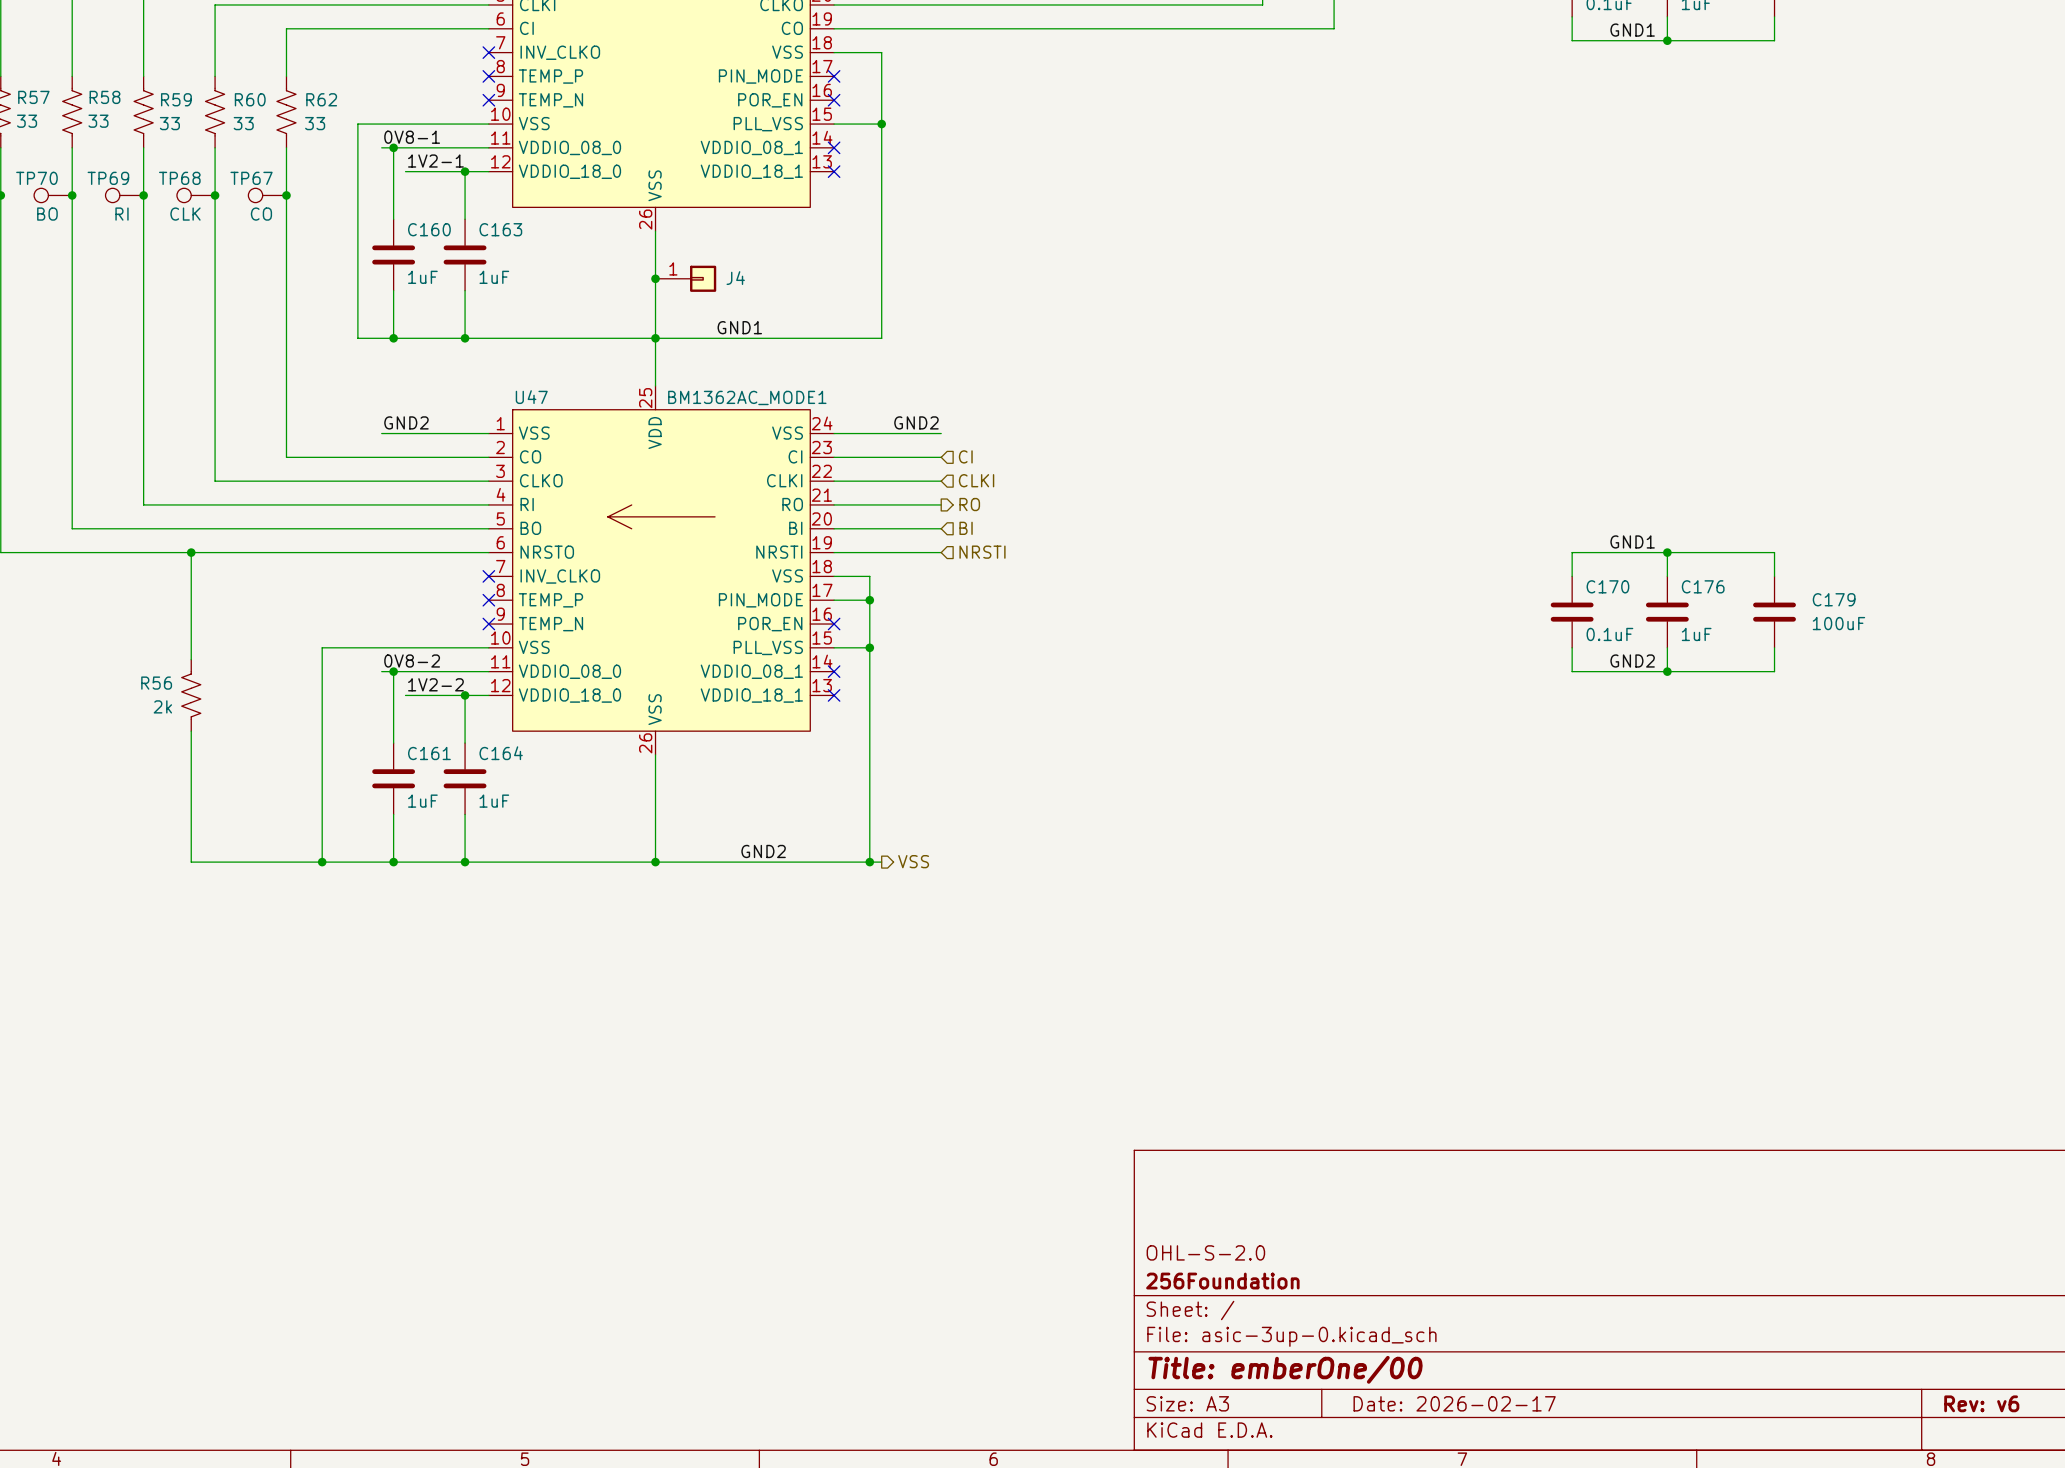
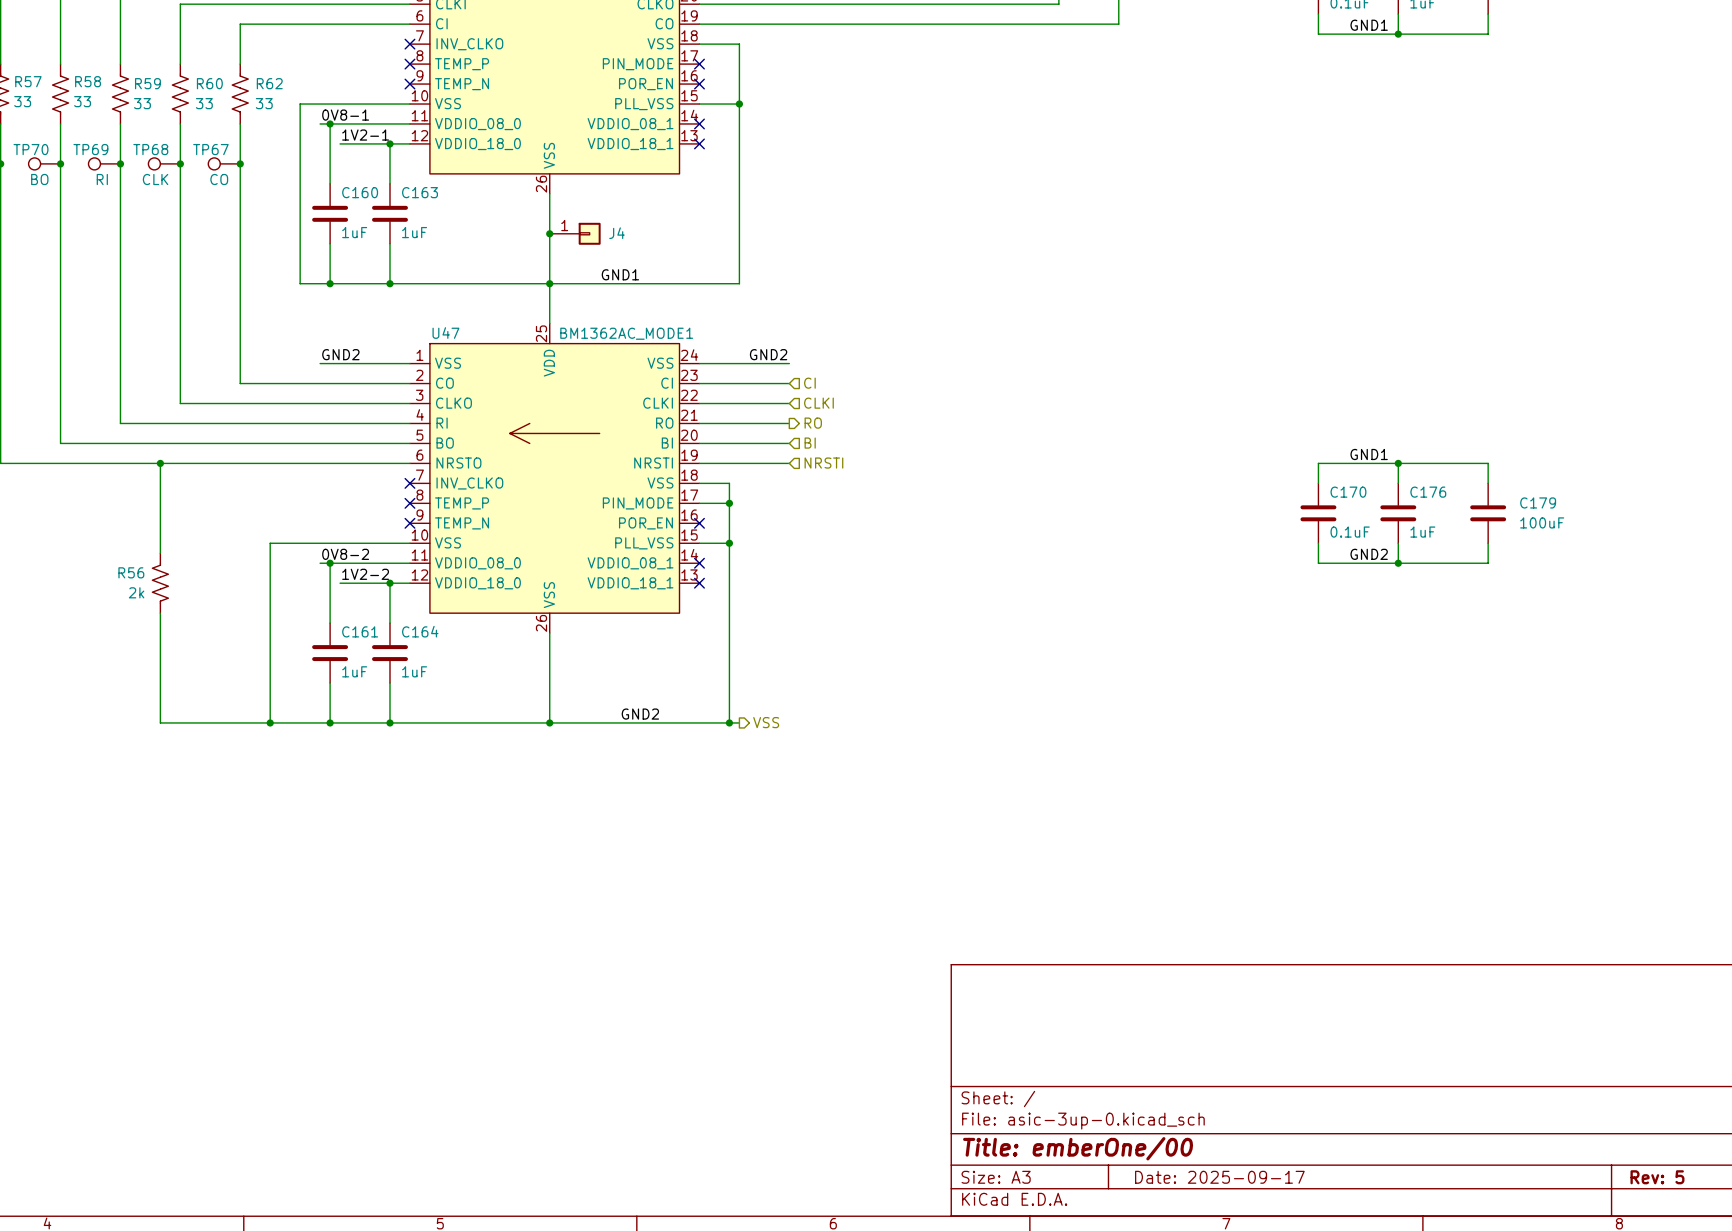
title block: OHL-S-2.0 (1205, 1252) -> none
title block: 256Foundation (1222, 1281) -> none
title block: Date: 2026-02-17 (1454, 1403) -> Date: 2025-09-17 (1219, 1177)
title block: Rev: v6 (1981, 1403) -> Rev: 5 (1657, 1177)

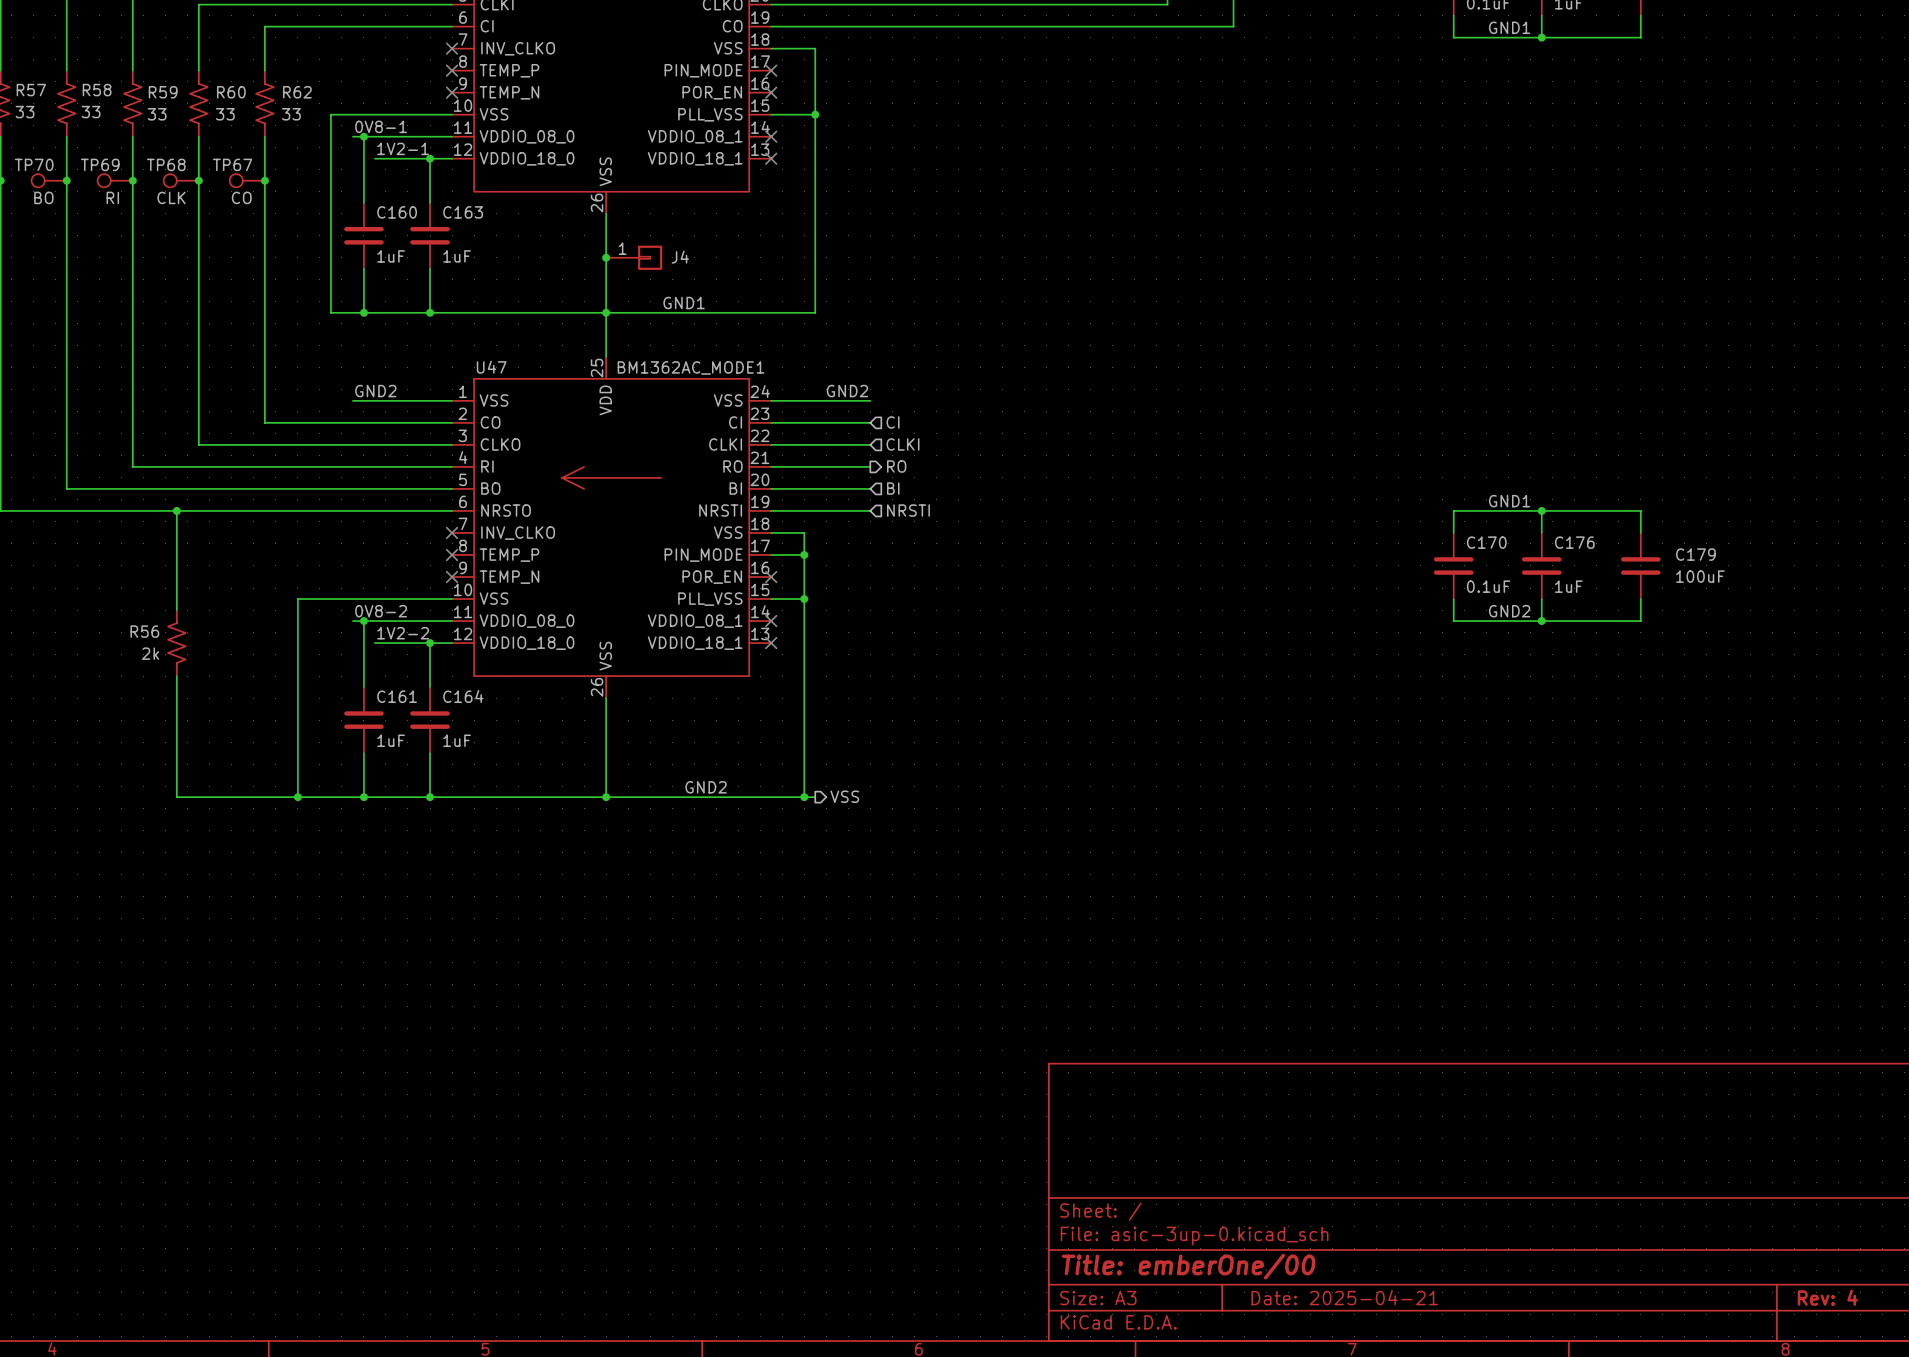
title block: Date: 2025-09-17 (1219, 1177) -> Date: 2025-04-21 (1344, 1297)
title block: Rev: 5 (1657, 1177) -> Rev: 4 (1827, 1297)

